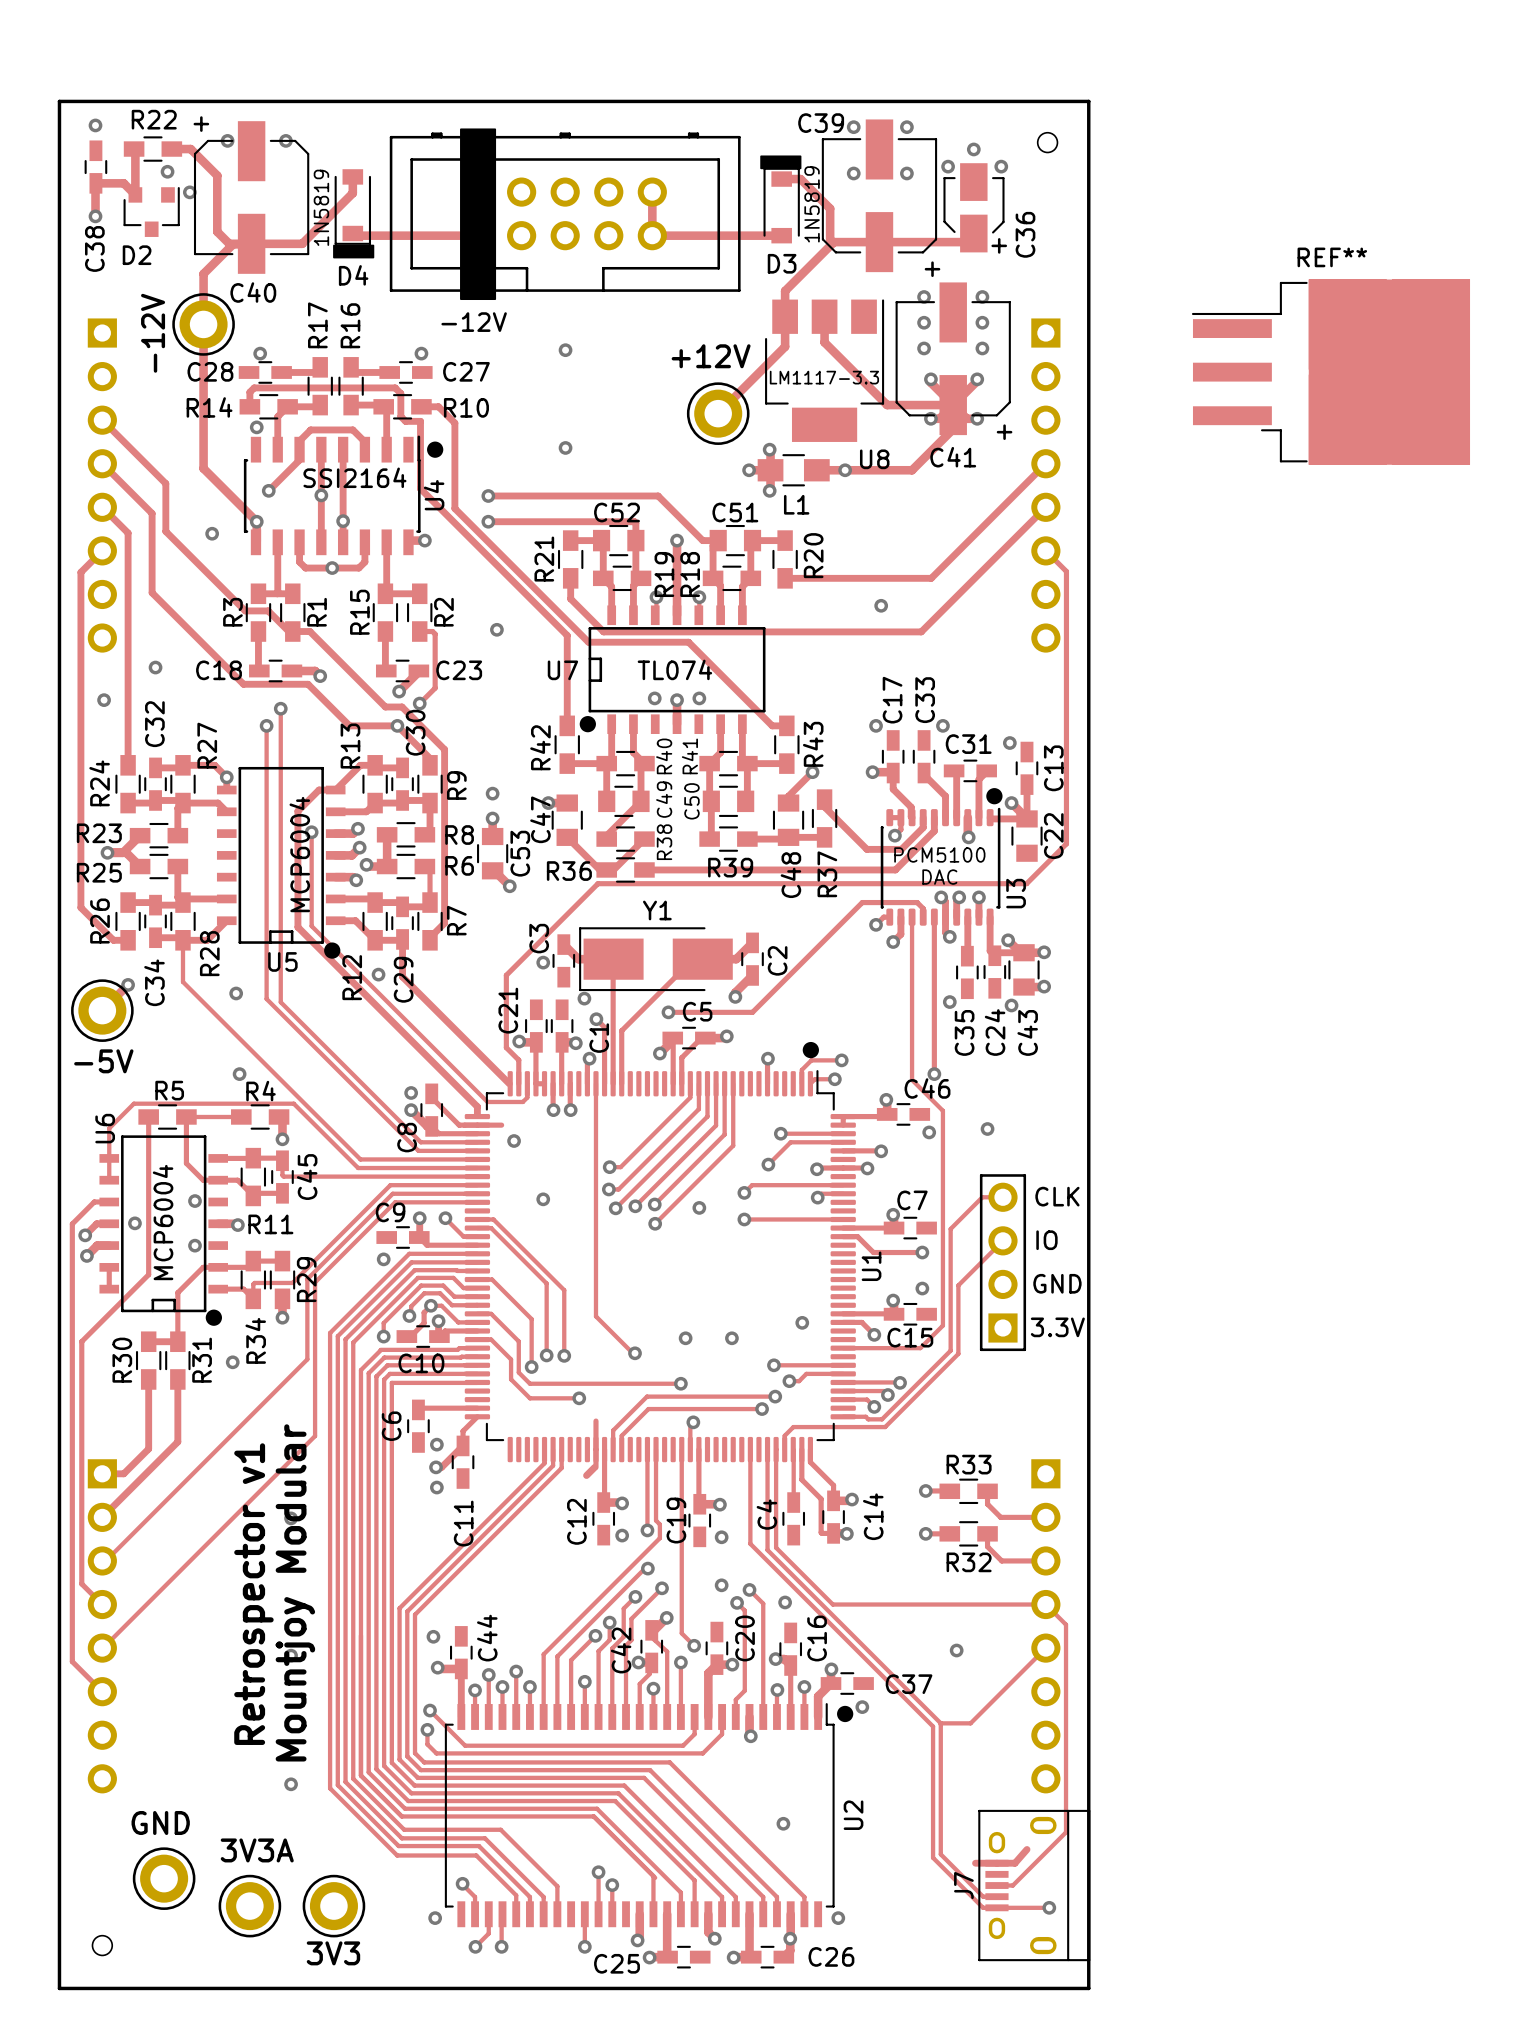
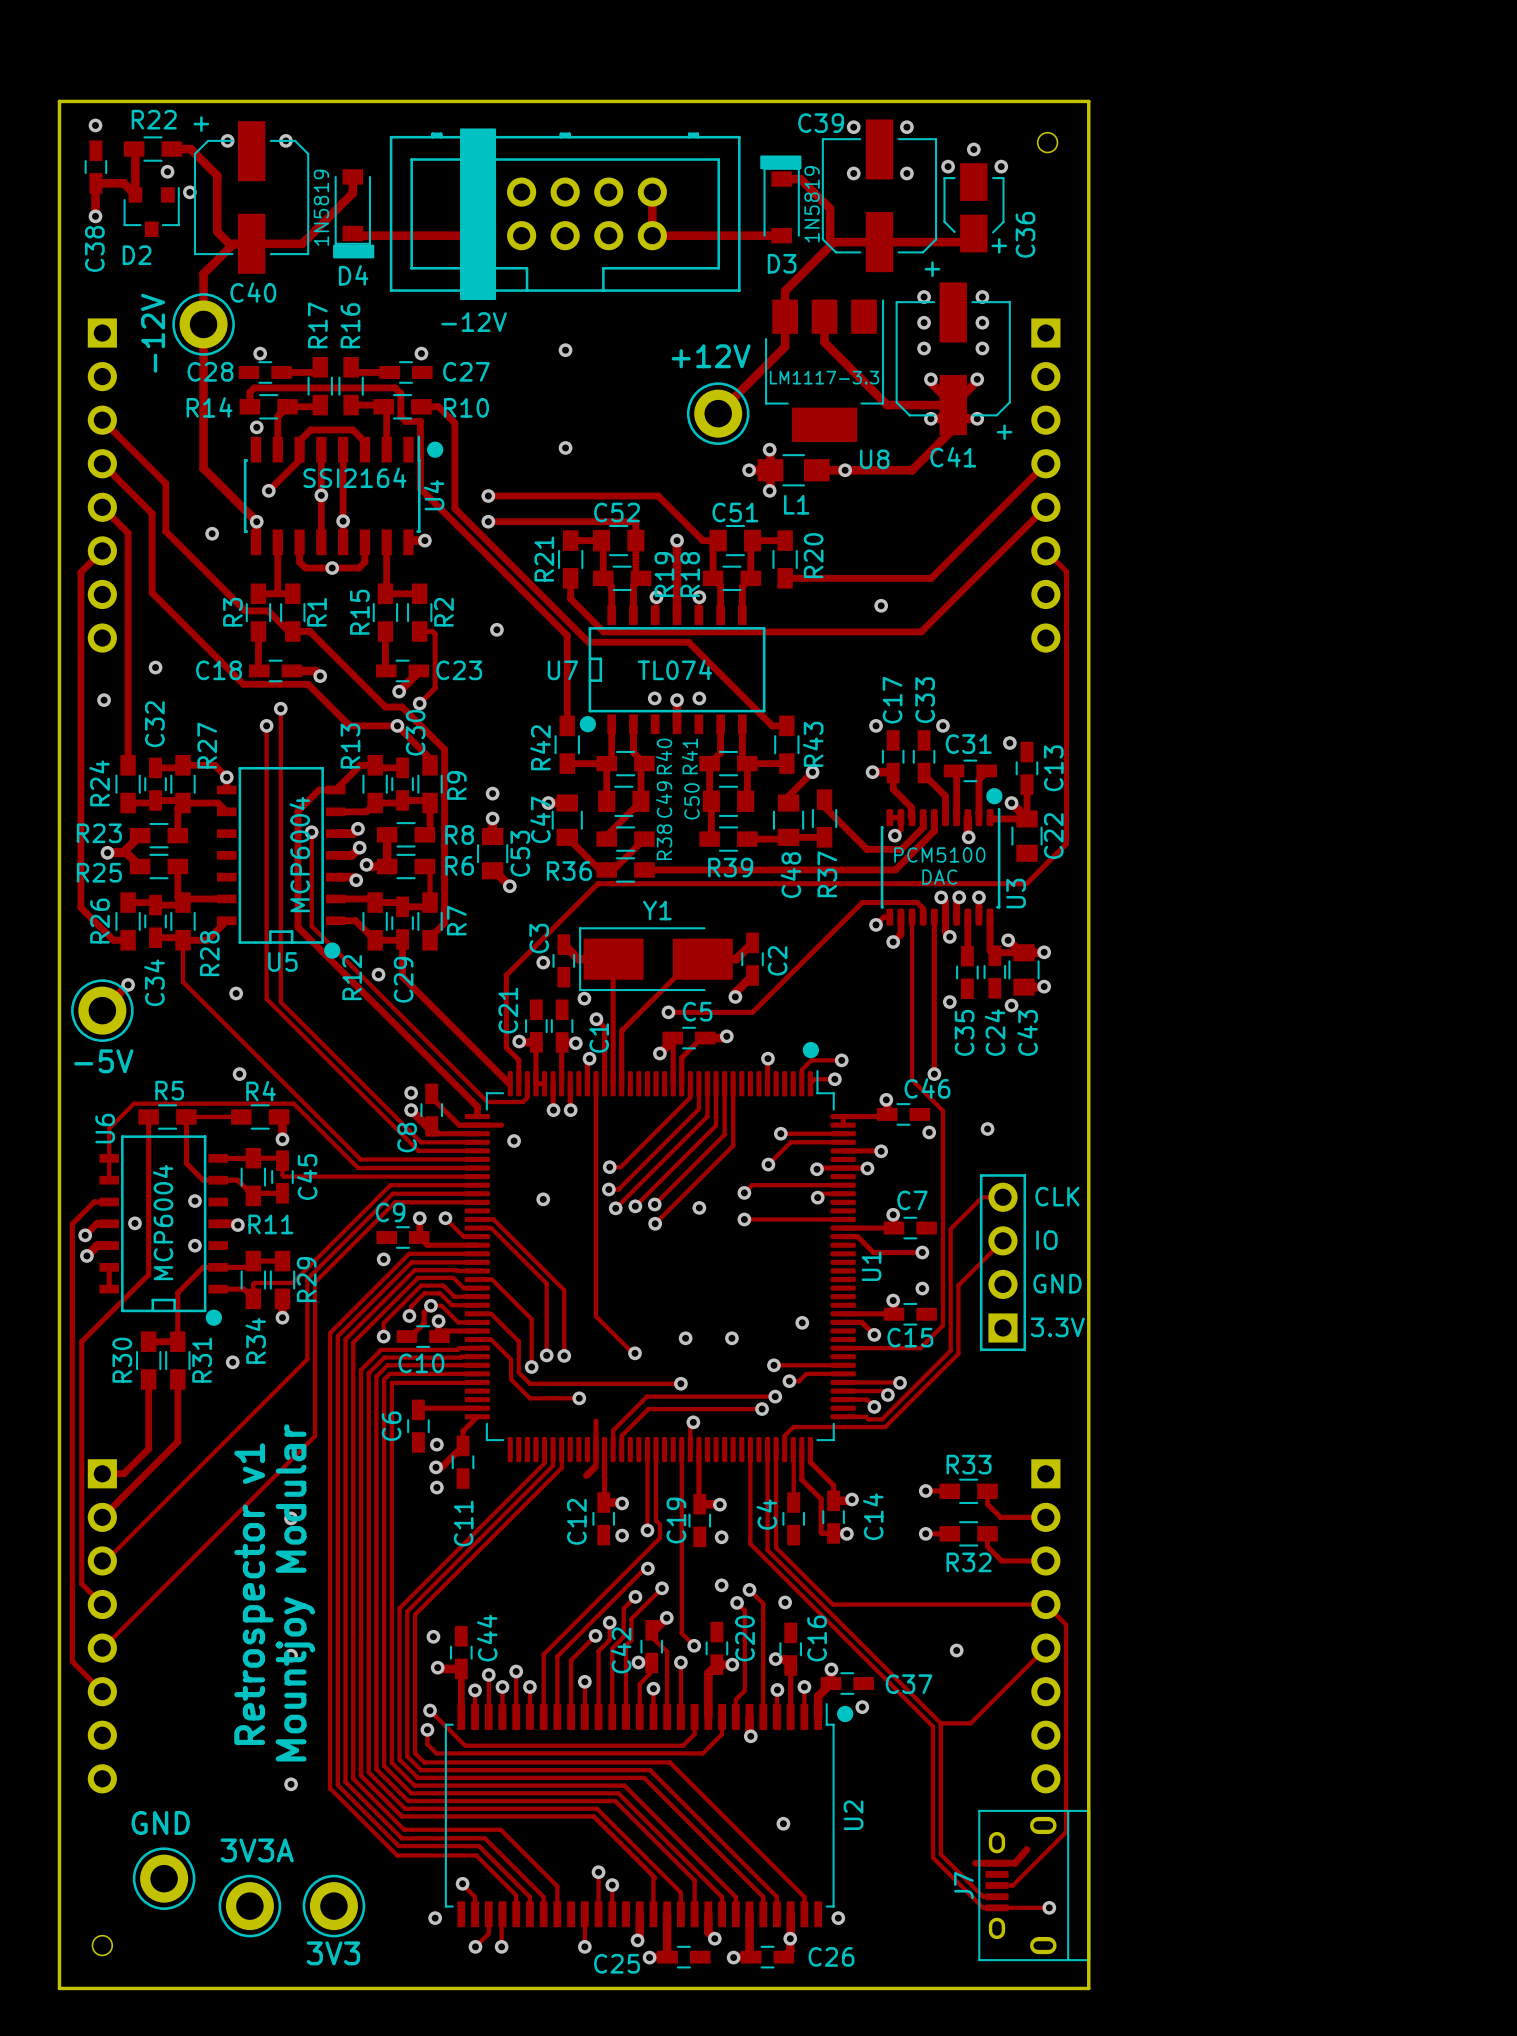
REF**: (1330, 372) -> none

